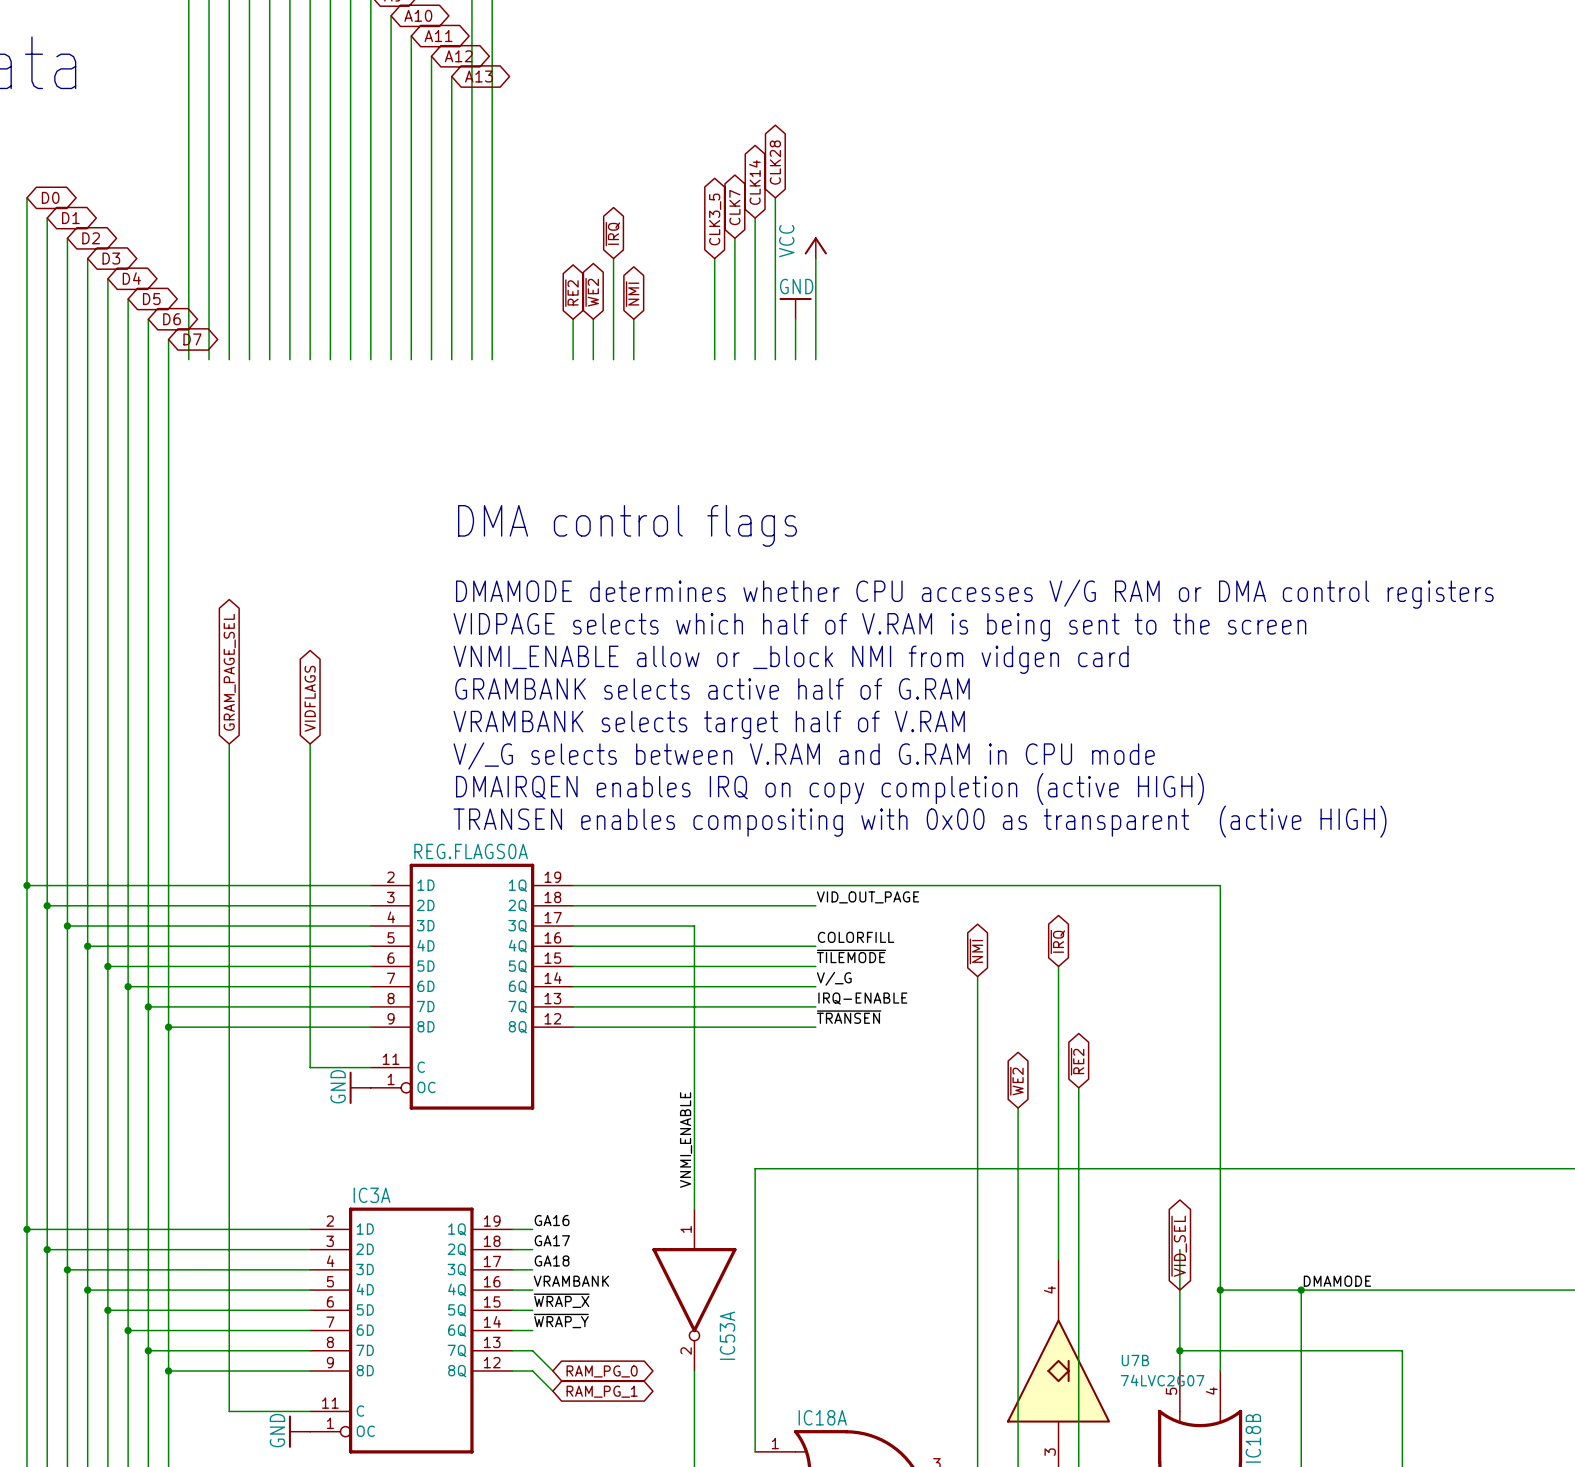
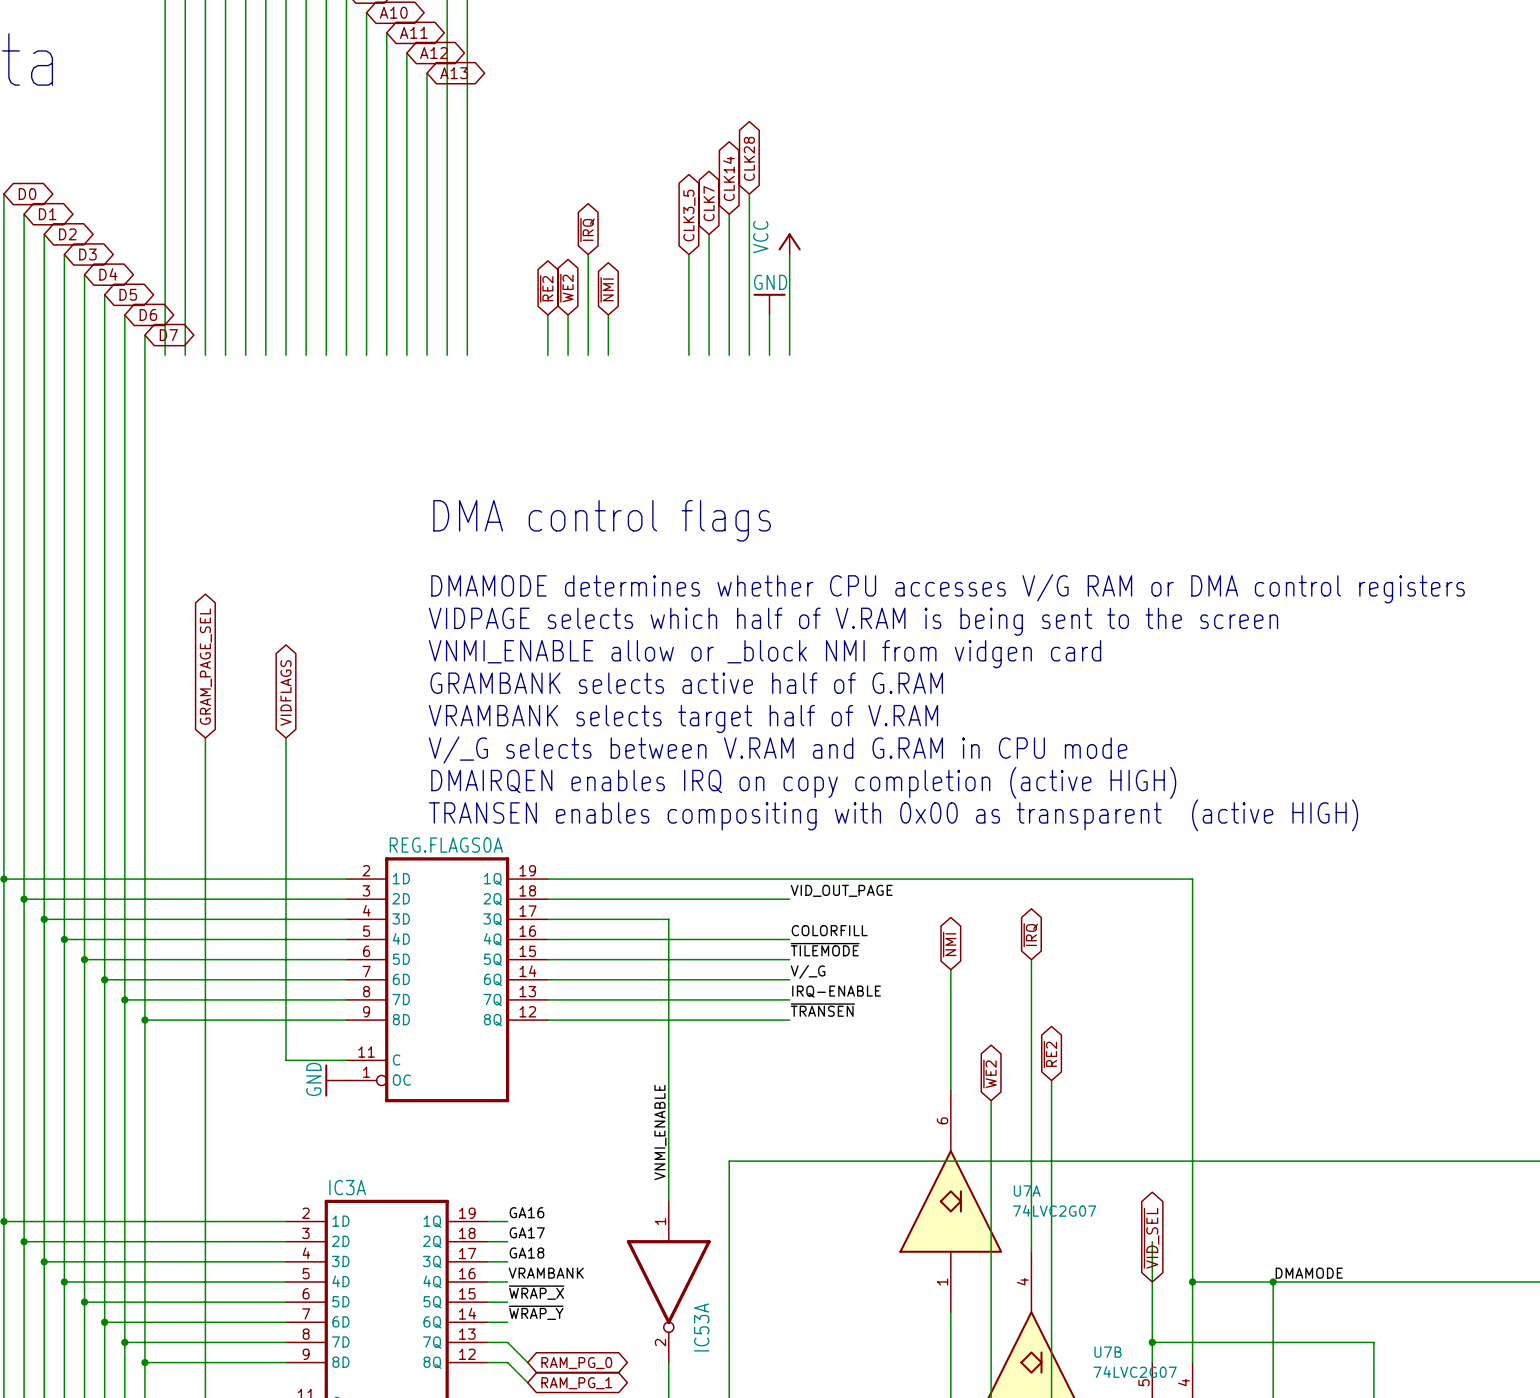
U7A: none -> 74LVC2G07 (950, 1201)

